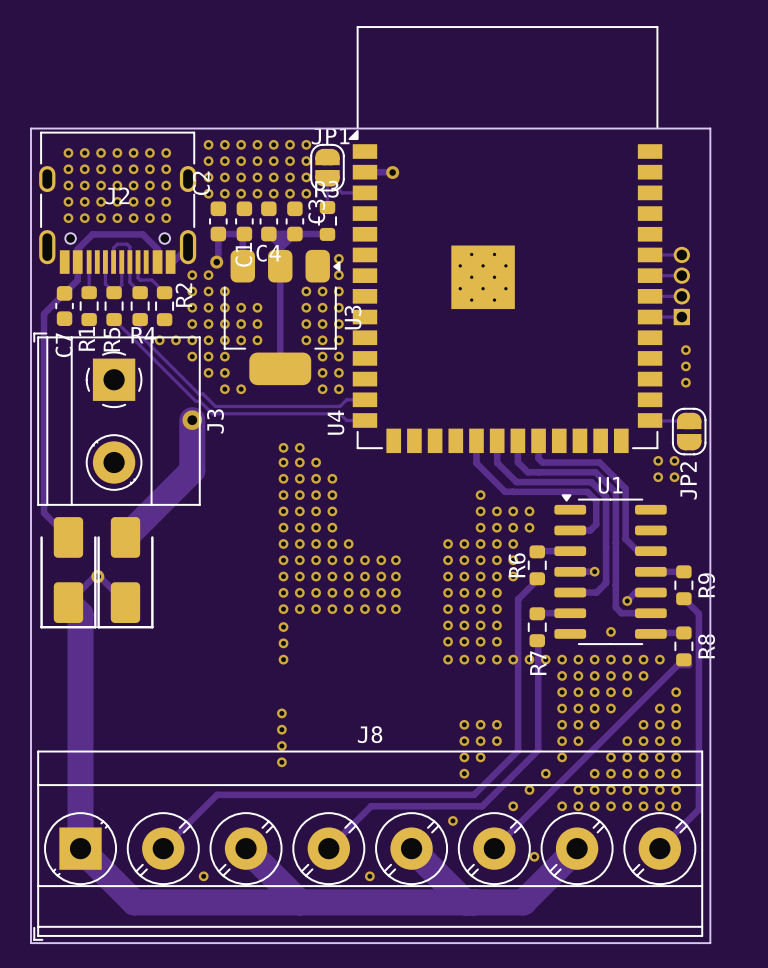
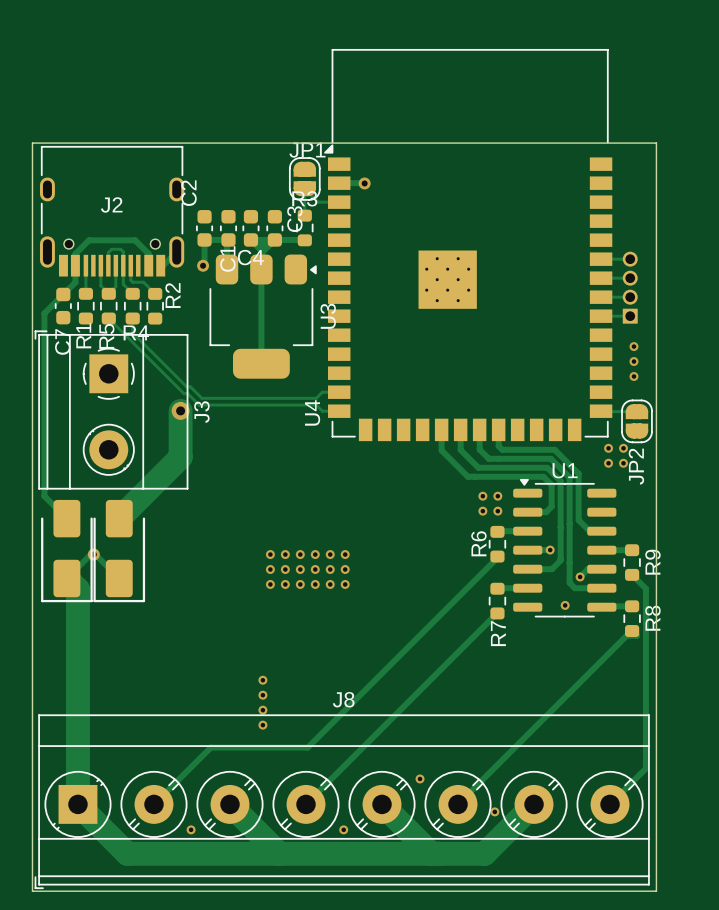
via: (208, 144) -> none
via: (224, 144) -> none
via: (241, 144) -> none
via: (257, 144) -> none
via: (273, 144) -> none
via: (290, 144) -> none
via: (306, 144) -> none
via: (68, 152) -> none
via: (84, 152) -> none
via: (101, 152) -> none
via: (117, 152) -> none
via: (133, 152) -> none
via: (149, 152) -> none
via: (166, 152) -> none
via: (208, 161) -> none
via: (224, 161) -> none
via: (241, 161) -> none
via: (257, 161) -> none
via: (273, 161) -> none
via: (290, 161) -> none
via: (306, 161) -> none
via: (68, 169) -> none
via: (84, 169) -> none
via: (101, 169) -> none
via: (117, 169) -> none
via: (133, 169) -> none
via: (149, 169) -> none
via: (166, 169) -> none
via: (208, 177) -> none
via: (224, 177) -> none
via: (241, 177) -> none
via: (257, 177) -> none
via: (273, 177) -> none
via: (290, 177) -> none
via: (306, 177) -> none
via: (68, 185) -> none
via: (84, 185) -> none
via: (101, 185) -> none
via: (117, 185) -> none
via: (133, 185) -> none
via: (149, 185) -> none
via: (166, 185) -> none
via: (208, 193) -> none
via: (224, 193) -> none
via: (241, 193) -> none
via: (257, 193) -> none
via: (273, 193) -> none
via: (290, 193) -> none
via: (306, 193) -> none
via: (68, 201) -> none
via: (84, 201) -> none
via: (101, 201) -> none
via: (117, 201) -> none
via: (133, 201) -> none
via: (149, 201) -> none
via: (166, 201) -> none
via: (68, 218) -> none
via: (84, 218) -> none
via: (101, 218) -> none
via: (117, 218) -> none
via: (133, 218) -> none
via: (149, 218) -> none
via: (166, 218) -> none
via: (338, 258) -> none
via: (192, 275) -> none
via: (208, 275) -> none
via: (338, 275) -> none
via: (192, 291) -> none
via: (208, 291) -> none
via: (224, 291) -> none
via: (306, 291) -> none
via: (322, 291) -> none
via: (338, 291) -> none
via: (192, 307) -> none
via: (208, 307) -> none
via: (224, 307) -> none
via: (241, 307) -> none
via: (257, 307) -> none
via: (306, 307) -> none
via: (322, 307) -> none
via: (338, 307) -> none
via: (192, 324) -> none
via: (208, 324) -> none
via: (224, 324) -> none
via: (241, 324) -> none
via: (257, 324) -> none
via: (306, 324) -> none
via: (322, 324) -> none
via: (338, 324) -> none
via: (159, 340) -> none
via: (175, 340) -> none
via: (192, 340) -> none
via: (208, 340) -> none
via: (224, 340) -> none
via: (241, 340) -> none
via: (257, 340) -> none
via: (306, 340) -> none
via: (322, 340) -> none
via: (338, 340) -> none
via: (192, 356) -> none
via: (208, 356) -> none
via: (224, 356) -> none
via: (322, 356) -> none
via: (338, 356) -> none
via: (208, 372) -> none
via: (224, 372) -> none
via: (322, 372) -> none
via: (338, 372) -> none
via: (224, 389) -> none
via: (241, 389) -> none
via: (322, 389) -> none
via: (338, 389) -> none
via: (283, 447) -> none
via: (299, 447) -> none
via: (283, 462) -> none
via: (299, 462) -> none
via: (316, 462) -> none
via: (283, 478) -> none
via: (299, 478) -> none
via: (316, 478) -> none
via: (332, 478) -> none
via: (283, 495) -> none
via: (299, 495) -> none
via: (316, 495) -> none
via: (332, 495) -> none
via: (480, 495) -> none
via: (283, 511) -> none
via: (299, 511) -> none
via: (316, 511) -> none
via: (332, 511) -> none
via: (480, 511) -> none
via: (496, 511) -> none
via: (513, 511) -> none
via: (529, 511) -> none
via: none -> (482, 496)
via: none -> (497, 496)
via: (283, 527) -> none
via: (299, 527) -> none
via: (316, 527) -> none
via: (332, 527) -> none
via: (480, 527) -> none
via: (496, 527) -> none
via: (513, 527) -> none
via: (529, 527) -> none
via: none -> (482, 511)
via: none -> (497, 511)
via: (283, 543) -> none
via: (299, 543) -> none
via: (316, 543) -> none
via: (332, 543) -> none
via: (348, 543) -> none
via: (448, 543) -> none
via: (464, 543) -> none
via: (480, 543) -> none
via: (496, 543) -> none
via: (513, 543) -> none
via: (283, 560) -> none
via: (299, 560) -> none
via: (316, 560) -> none
via: (332, 560) -> none
via: (348, 560) -> none
via: (364, 560) -> none
via: (381, 560) -> none
via: (395, 560) -> none
via: (448, 560) -> none
via: (464, 560) -> none
via: (480, 560) -> none
via: (496, 560) -> none
via: (513, 560) -> none
via: (283, 576) -> none
via: none -> (270, 554)
via: (299, 576) -> none
via: none -> (285, 554)
via: (316, 576) -> none
via: none -> (300, 554)
via: (332, 576) -> none
via: none -> (315, 554)
via: (348, 576) -> none
via: none -> (330, 554)
via: (364, 576) -> none
via: none -> (345, 554)
via: (381, 576) -> none
via: (395, 576) -> none
via: (448, 576) -> none
via: (464, 576) -> none
via: (480, 576) -> none
via: (496, 576) -> none
via: (513, 576) -> none
via: (283, 592) -> none
via: none -> (270, 569)
via: (299, 592) -> none
via: none -> (285, 569)
via: (316, 592) -> none
via: none -> (300, 569)
via: (332, 592) -> none
via: none -> (315, 569)
via: (348, 592) -> none
via: none -> (330, 569)
via: (364, 592) -> none
via: none -> (345, 569)
via: (381, 592) -> none
via: (395, 592) -> none
via: (448, 592) -> none
via: (464, 592) -> none
via: (480, 592) -> none
via: (496, 592) -> none
track: (518, 599) (518, 750) (474, 794) (217, 794) -> (479, 575) (307, 747) (210, 747) (203, 755)
via: (283, 609) -> none
via: none -> (270, 584)
via: (299, 609) -> none
via: none -> (285, 584)
via: (316, 609) -> none
via: none -> (300, 584)
via: (332, 609) -> none
via: none -> (315, 584)
via: (348, 609) -> none
via: none -> (330, 584)
via: (364, 609) -> none
via: none -> (345, 584)
via: (381, 609) -> none
via: (395, 609) -> none
via: (448, 609) -> none
via: (464, 609) -> none
via: (480, 609) -> none
via: (496, 609) -> none
via: (448, 625) -> none
via: (464, 625) -> none
via: (480, 625) -> none
via: (496, 625) -> none
via: (283, 627) -> none
track: (538, 640) (538, 750) (482, 806) (371, 806) -> (498, 613) (344, 765)
via: (448, 641) -> none
via: (464, 641) -> none
via: (480, 641) -> none
via: (496, 641) -> none
via: (283, 643) -> none
via: (283, 659) -> none
via: (448, 659) -> none
via: (464, 659) -> none
via: (480, 659) -> none
via: (496, 659) -> none
via: (513, 659) -> none
via: (529, 659) -> none
via: (545, 659) -> none
via: (562, 659) -> none
via: (578, 659) -> none
via: (594, 659) -> none
via: (610, 659) -> none
via: (627, 659) -> none
via: (643, 659) -> none
via: (659, 659) -> none
via: (562, 675) -> none
via: (578, 675) -> none
via: (594, 675) -> none
via: (610, 675) -> none
via: (627, 675) -> none
via: (643, 675) -> none
via: (562, 692) -> none
via: (578, 692) -> none
via: (594, 692) -> none
via: (610, 692) -> none
via: (627, 692) -> none
via: (676, 692) -> none
via: (562, 708) -> none
via: (578, 708) -> none
via: (594, 708) -> none
via: (610, 708) -> none
via: (659, 708) -> none
via: (676, 708) -> none
via: (464, 724) -> none
via: (480, 724) -> none
via: (496, 724) -> none
via: (562, 724) -> none
via: (578, 724) -> none
via: (594, 724) -> none
via: (643, 724) -> none
via: (659, 724) -> none
via: (676, 724) -> none
via: (464, 741) -> none
via: (480, 741) -> none
via: (496, 741) -> none
via: (562, 741) -> none
via: (578, 741) -> none
via: (627, 741) -> none
via: (643, 741) -> none
via: (659, 741) -> none
via: (676, 741) -> none
via: (464, 757) -> none
via: (480, 757) -> none
via: (562, 757) -> none
via: (610, 757) -> none
via: (627, 757) -> none
via: (643, 757) -> none
via: (659, 757) -> none
via: (676, 757) -> none
via: (464, 773) -> none
via: (545, 773) -> none
via: (594, 773) -> none
via: (610, 773) -> none
via: (627, 773) -> none
via: (643, 773) -> none
via: (659, 773) -> none
via: (676, 773) -> none
via: (529, 789) -> none
via: (578, 789) -> none
via: (594, 789) -> none
via: (610, 789) -> none
via: (627, 789) -> none
via: (643, 789) -> none
via: (659, 789) -> none
via: (676, 789) -> none
via: (513, 806) -> none
via: (562, 806) -> none
via: (578, 806) -> none
via: (594, 806) -> none
via: (610, 806) -> none
via: (627, 806) -> none
via: (643, 806) -> none
via: (659, 806) -> none
via: (676, 806) -> none

